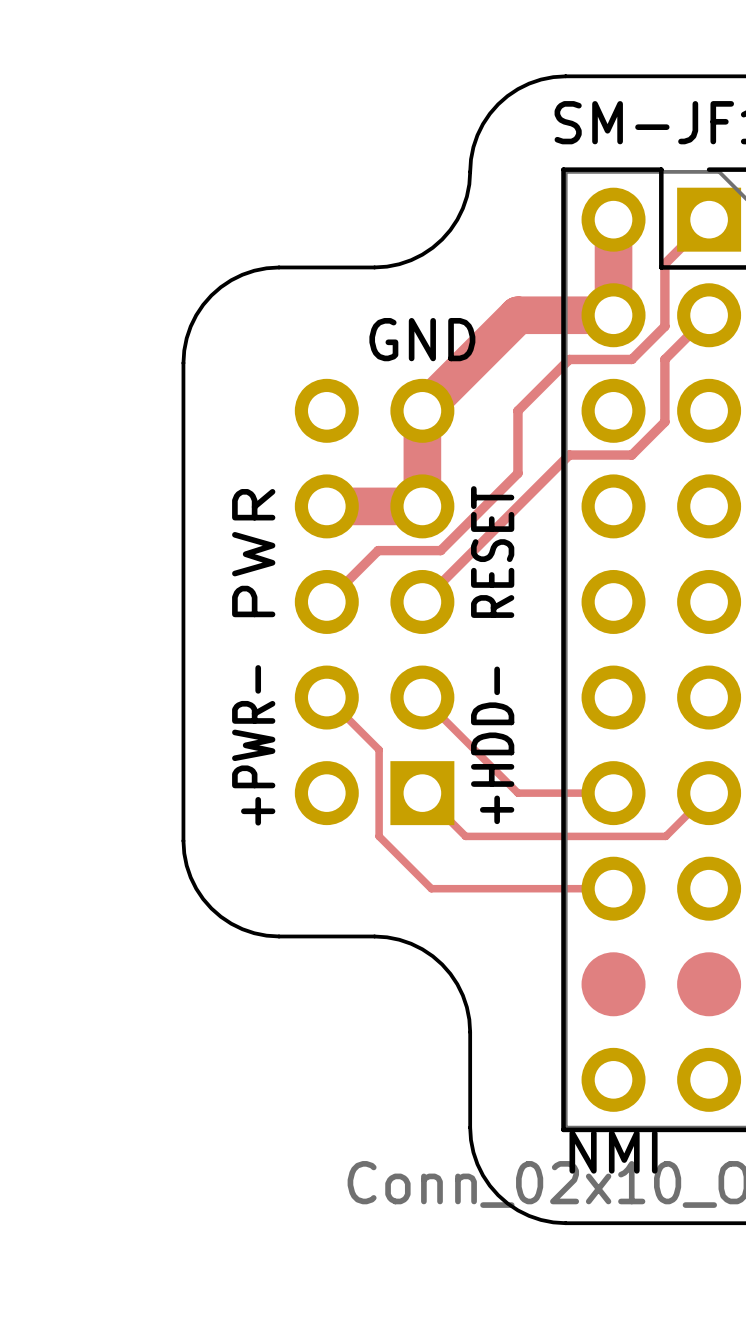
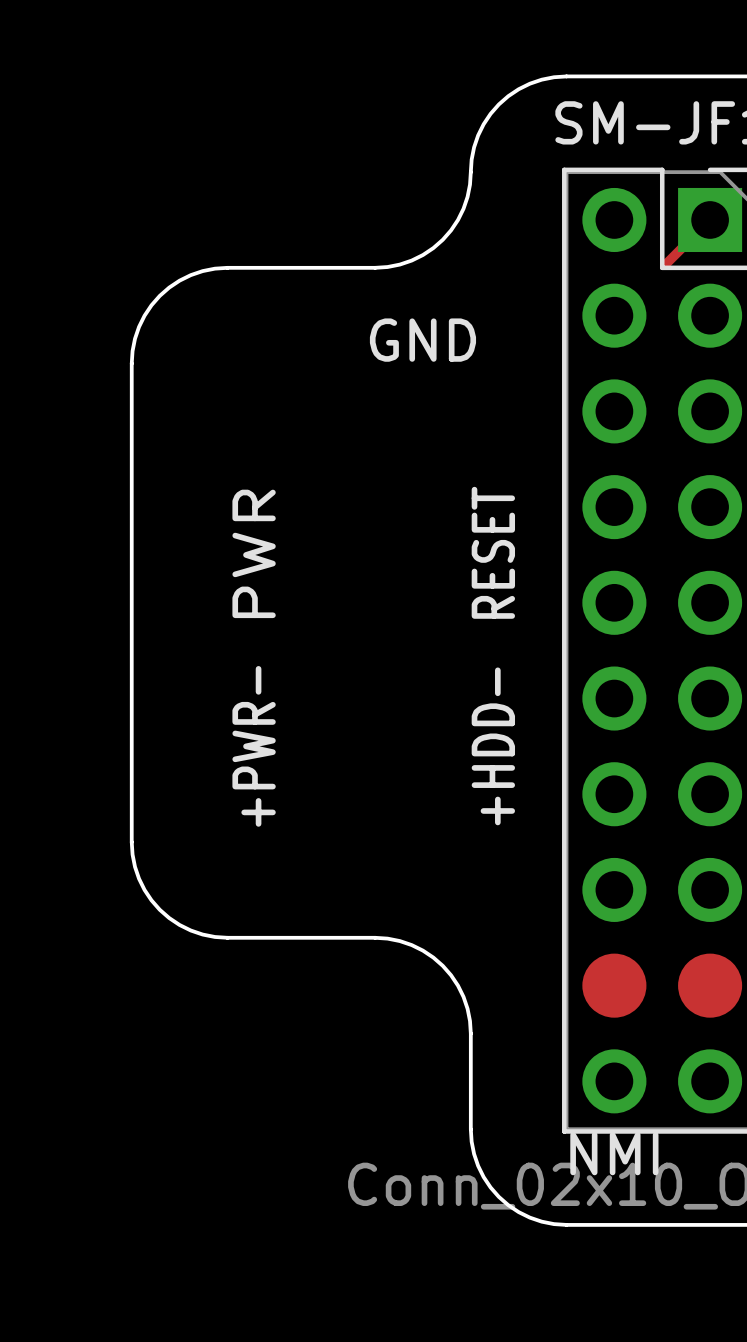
track: (613, 219) (613, 315) (517, 315) (422, 410) (422, 506) (326, 506) -> none
track: (664, 263) (664, 326) (631, 359) (569, 359) (517, 410) (517, 473) (440, 550) (378, 550) (326, 601) -> none
board edge: (279, 267) (266, 268) (242, 274) (220, 287) (211, 295) (203, 304) (190, 326) (186, 338) (183, 363) (184, 853) (186, 865) (196, 888) (211, 908) (220, 916) (242, 929) (266, 935) (279, 936) -> (279, 267) (214, 268) (202, 271) (179, 280) (159, 295) (144, 315) (135, 338) (131, 363) (131, 842) (135, 866) (139, 878) (151, 900) (169, 918) (190, 930) (214, 936) (279, 937)
track: (709, 315) (664, 359) (664, 421) (631, 455) (569, 455) (422, 601) -> none
part: (374, 601) -> none
track: (326, 697) (379, 749) (379, 836) (431, 888) (613, 888) -> none
track: (422, 697) (517, 793) (613, 793) -> none
track: (422, 793) (465, 836) (665, 836) (709, 793) -> none

